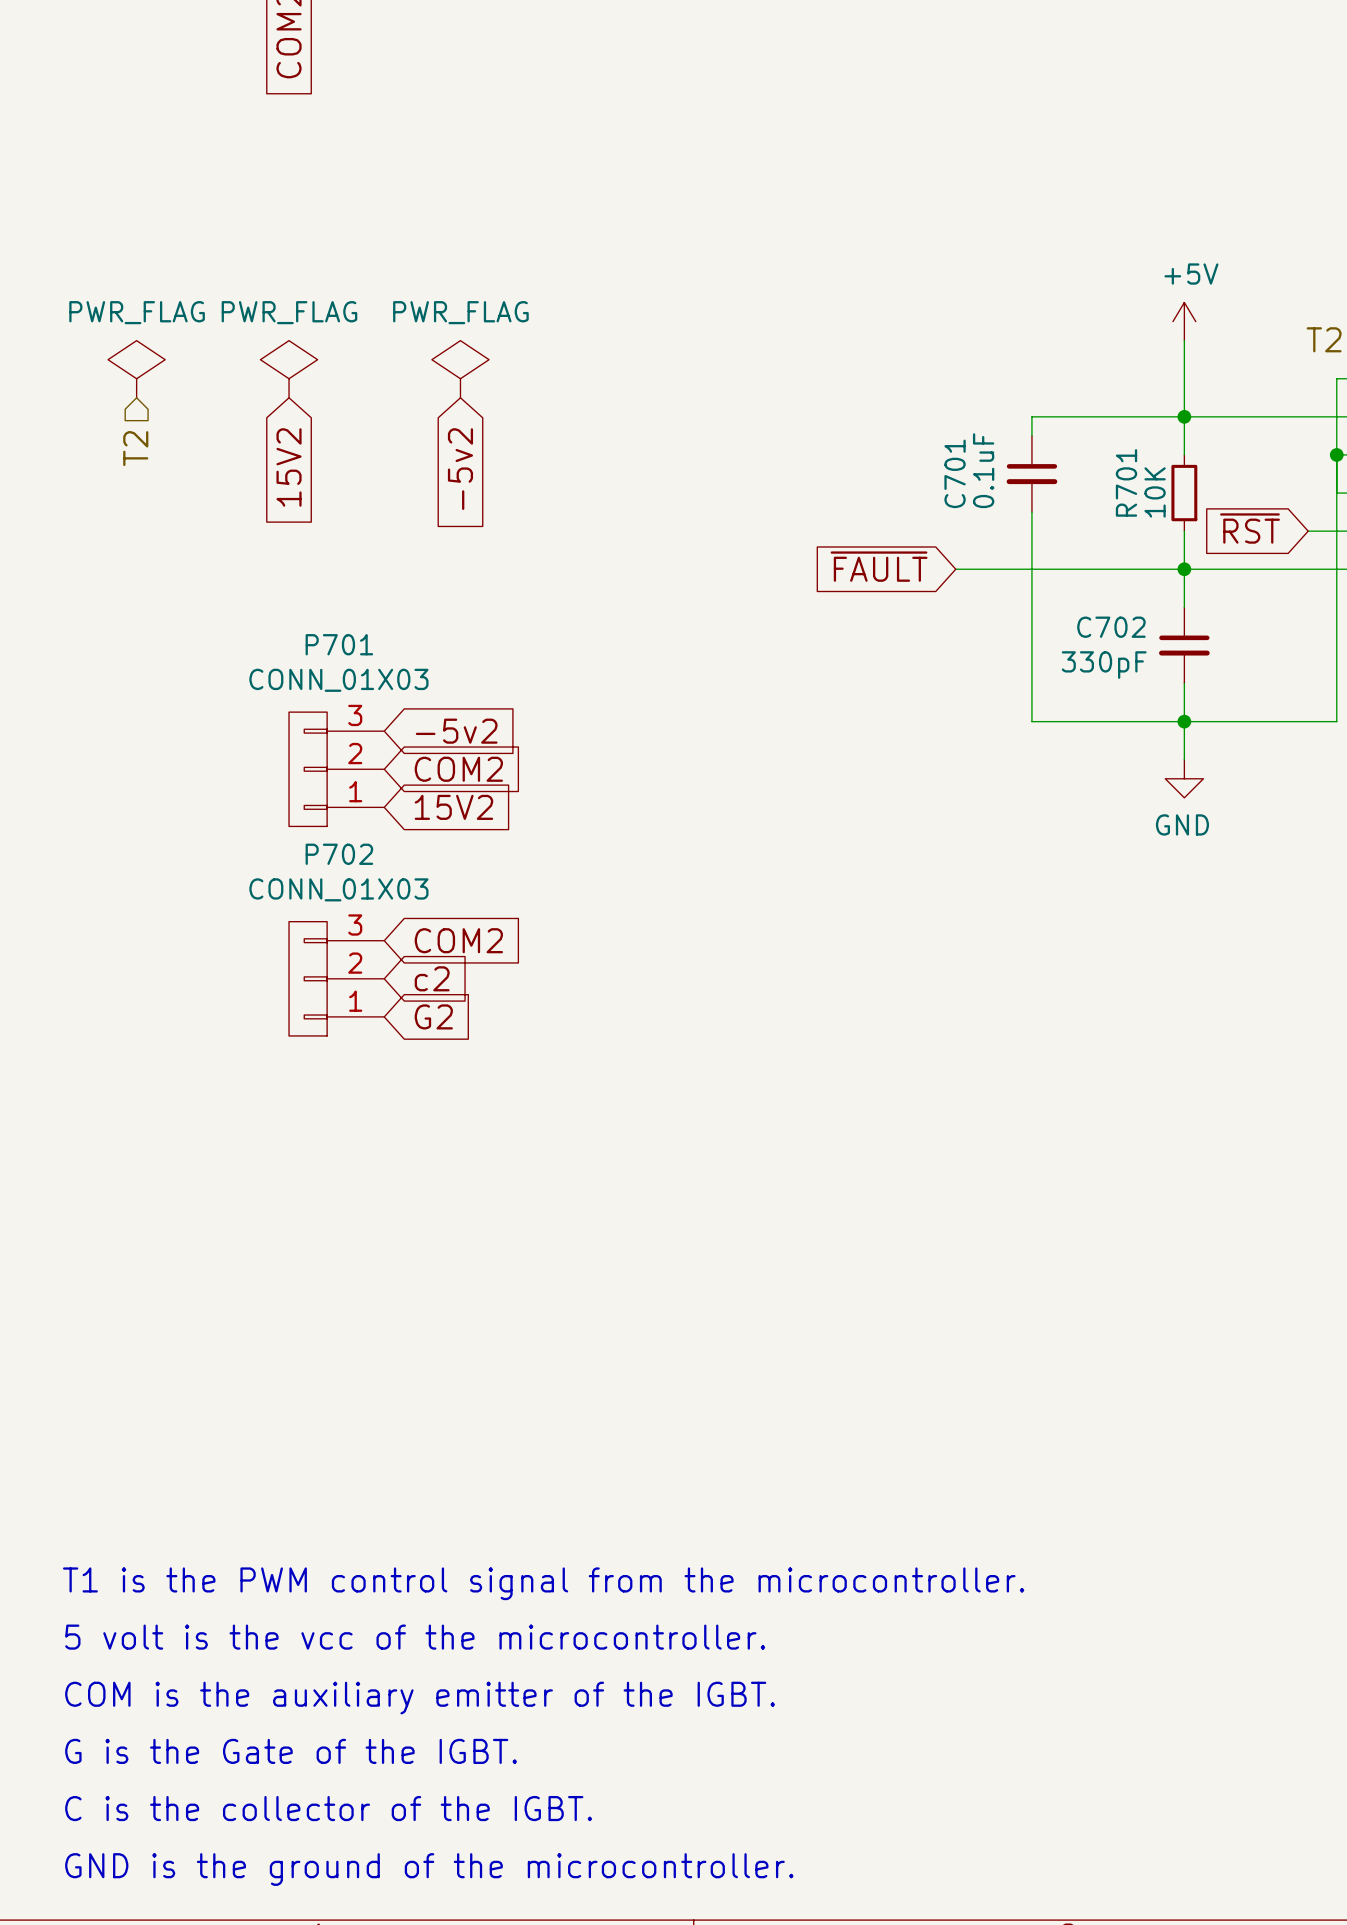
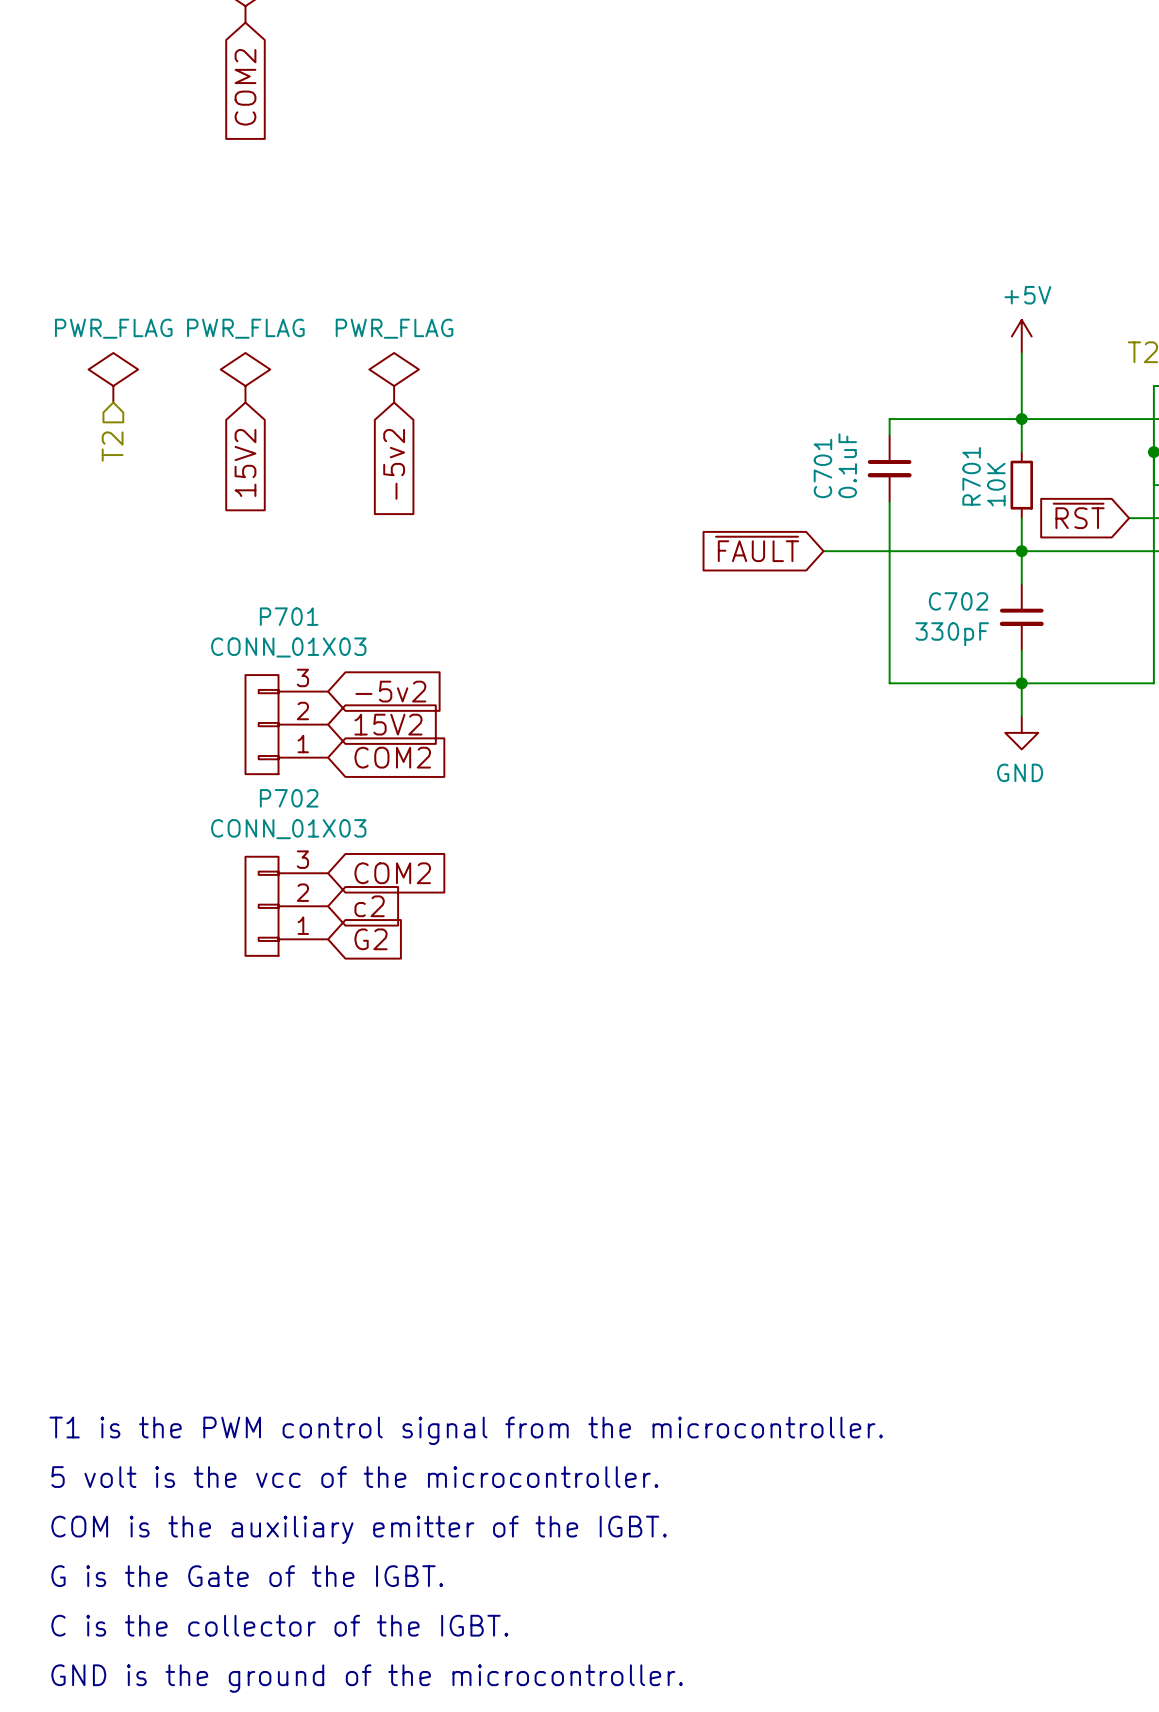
global label: COM2 (458, 769) -> 15V2 (388, 724)
global label: 15V2 (453, 807) -> COM2 (392, 757)

